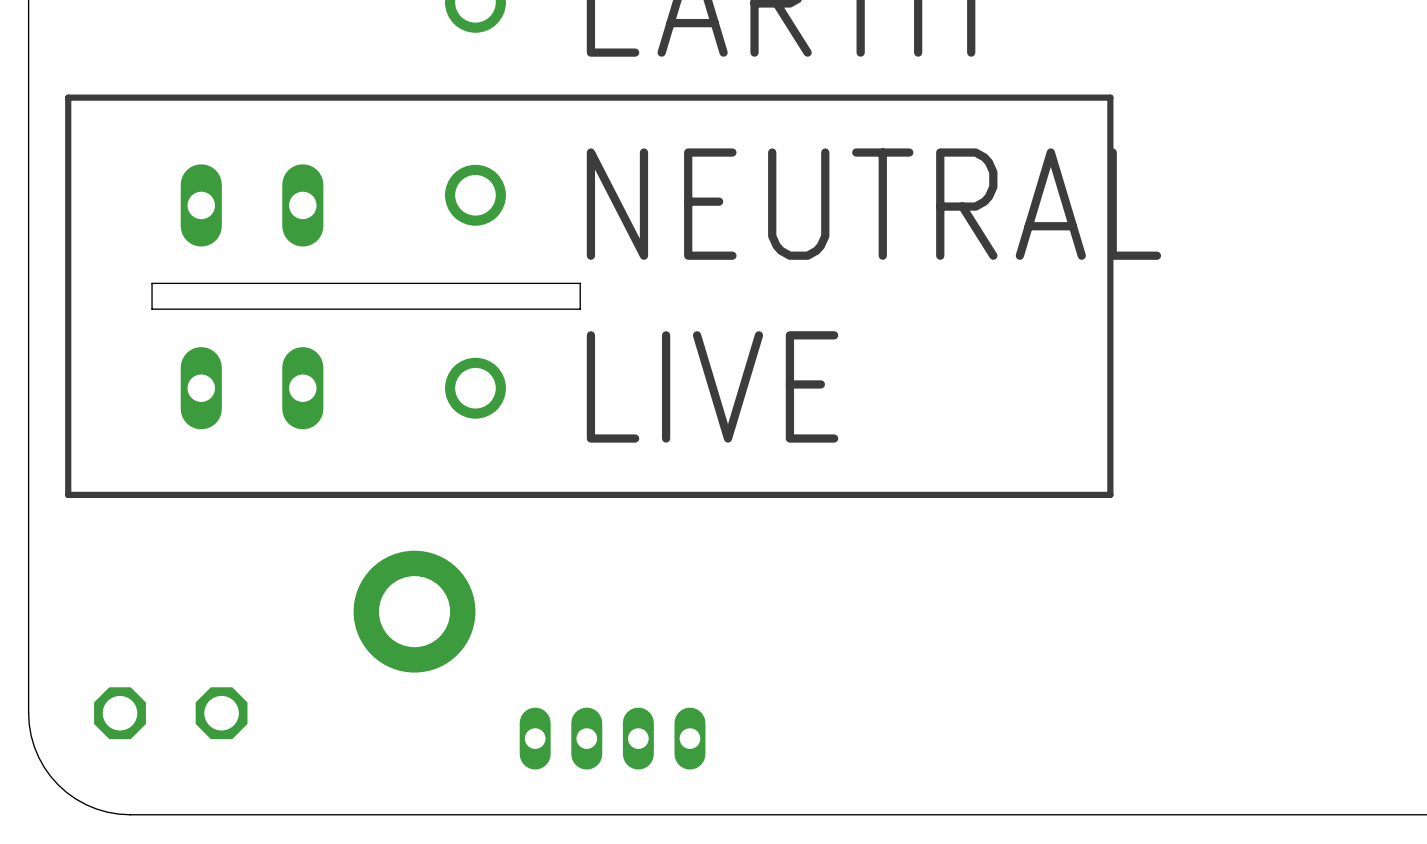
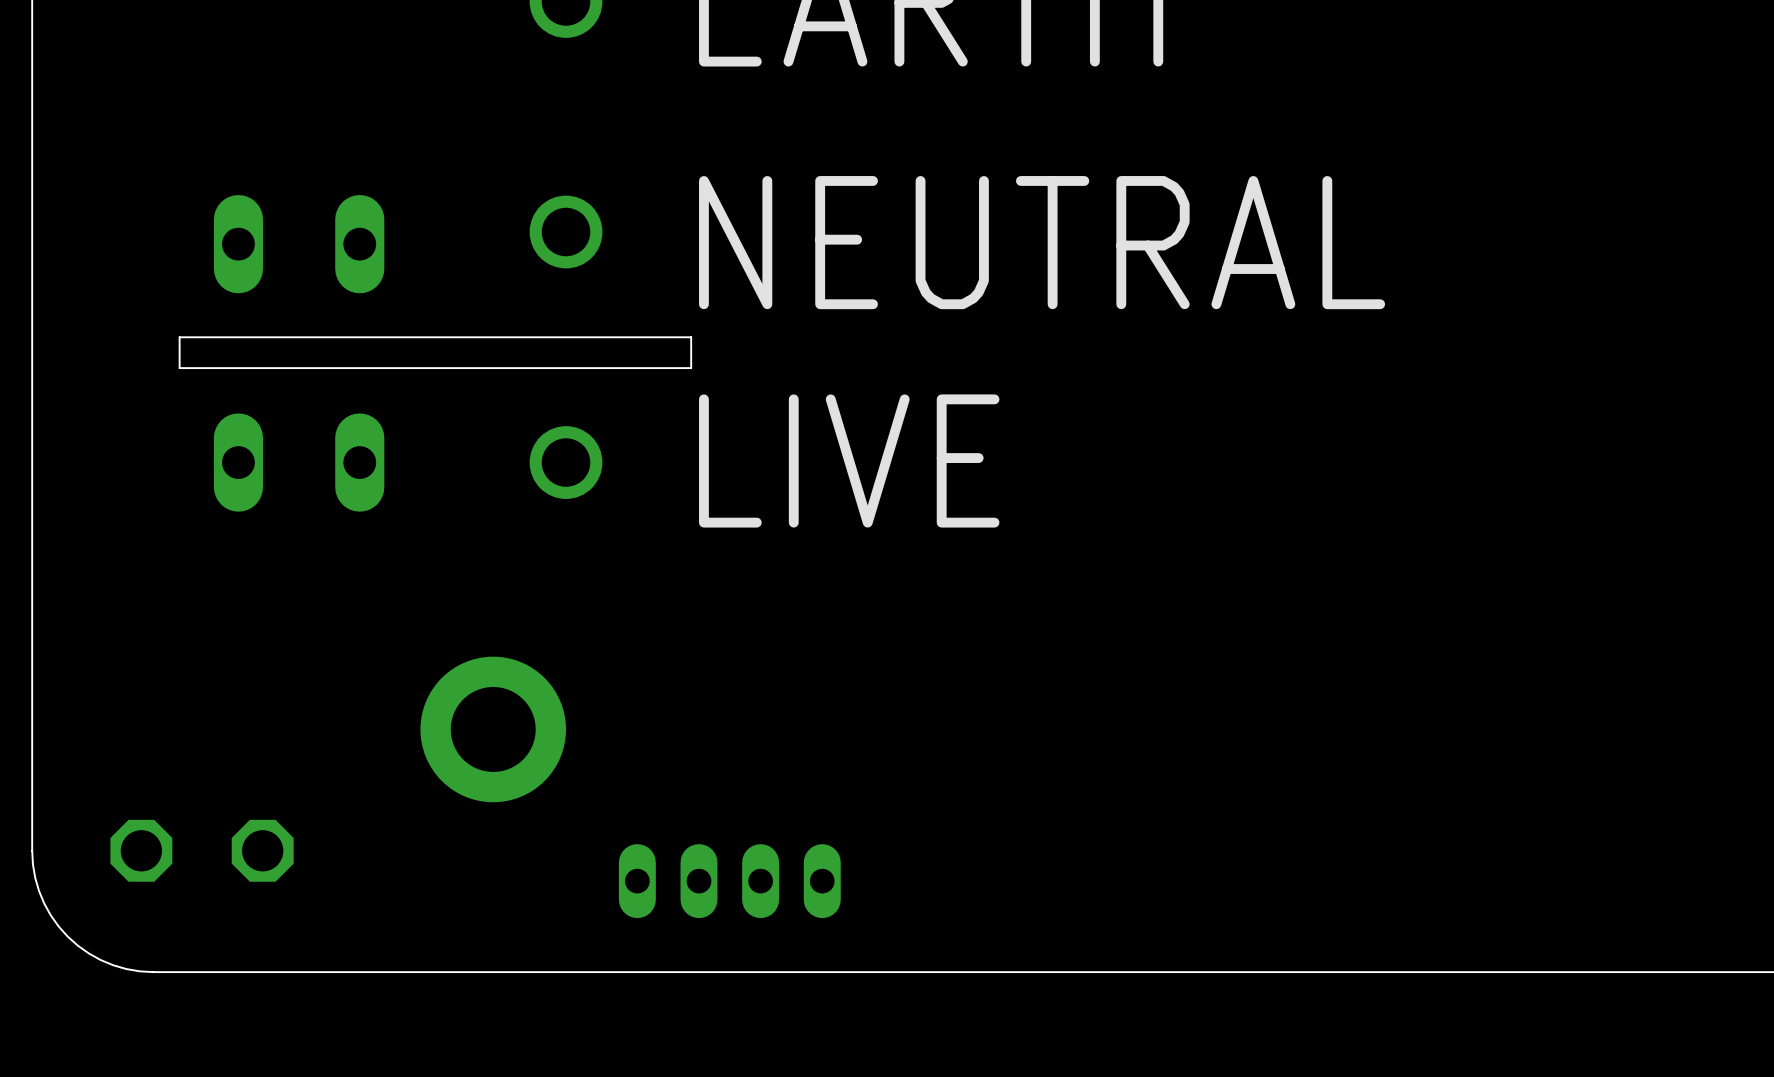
line: (1110, 97) (68, 97) (68, 494) (1110, 494) (1110, 97) -> none

